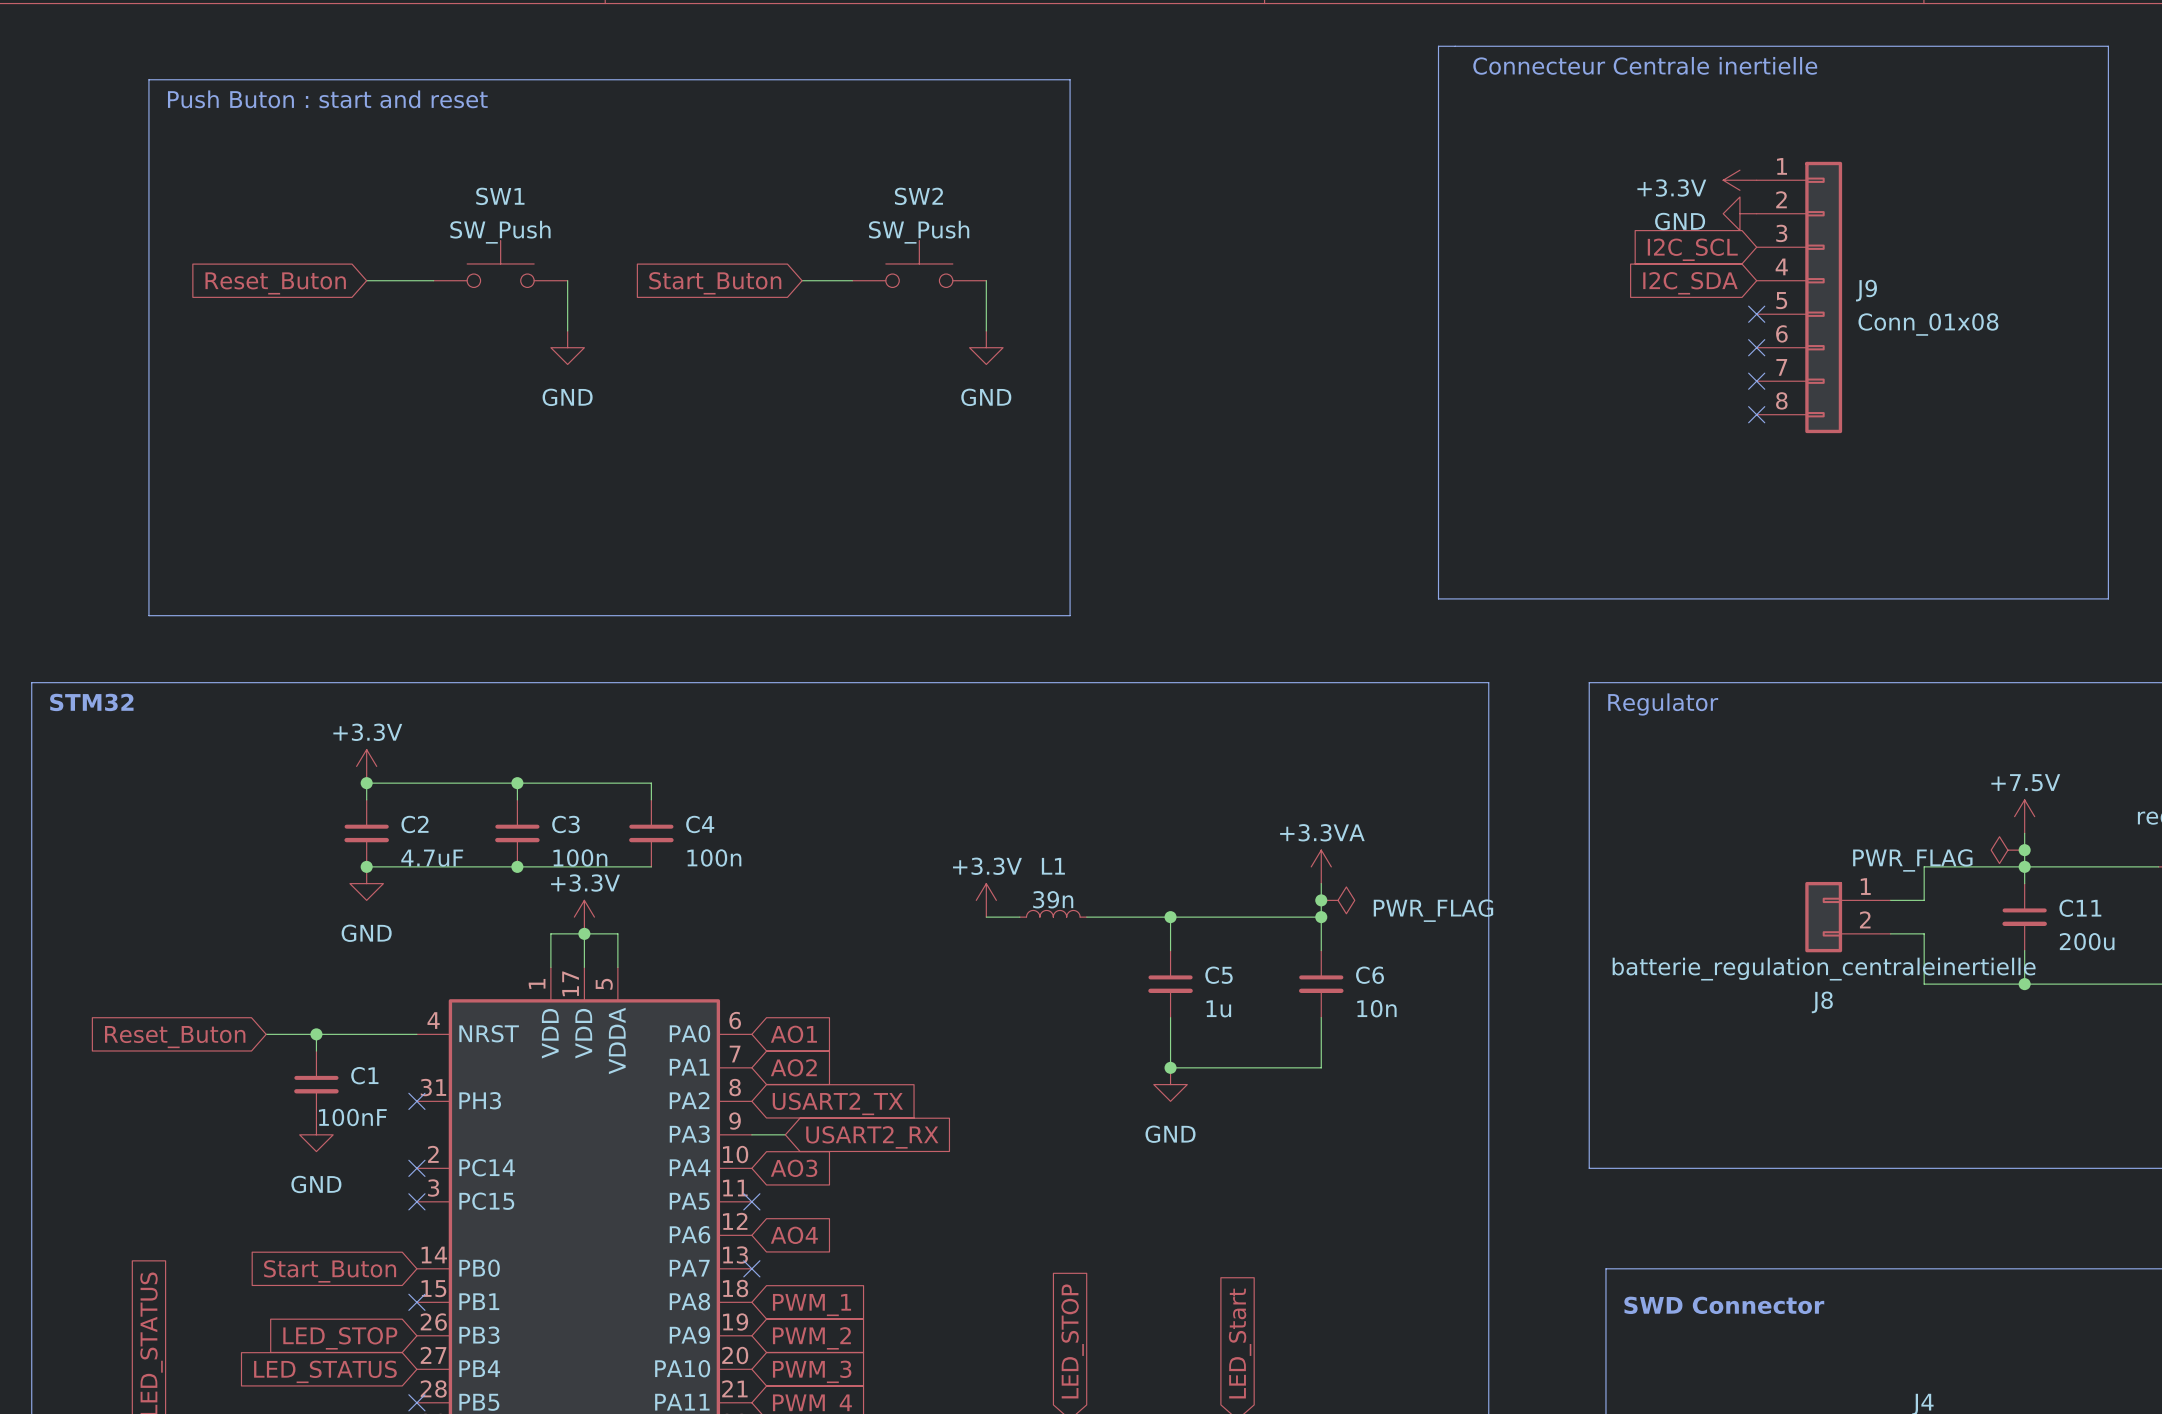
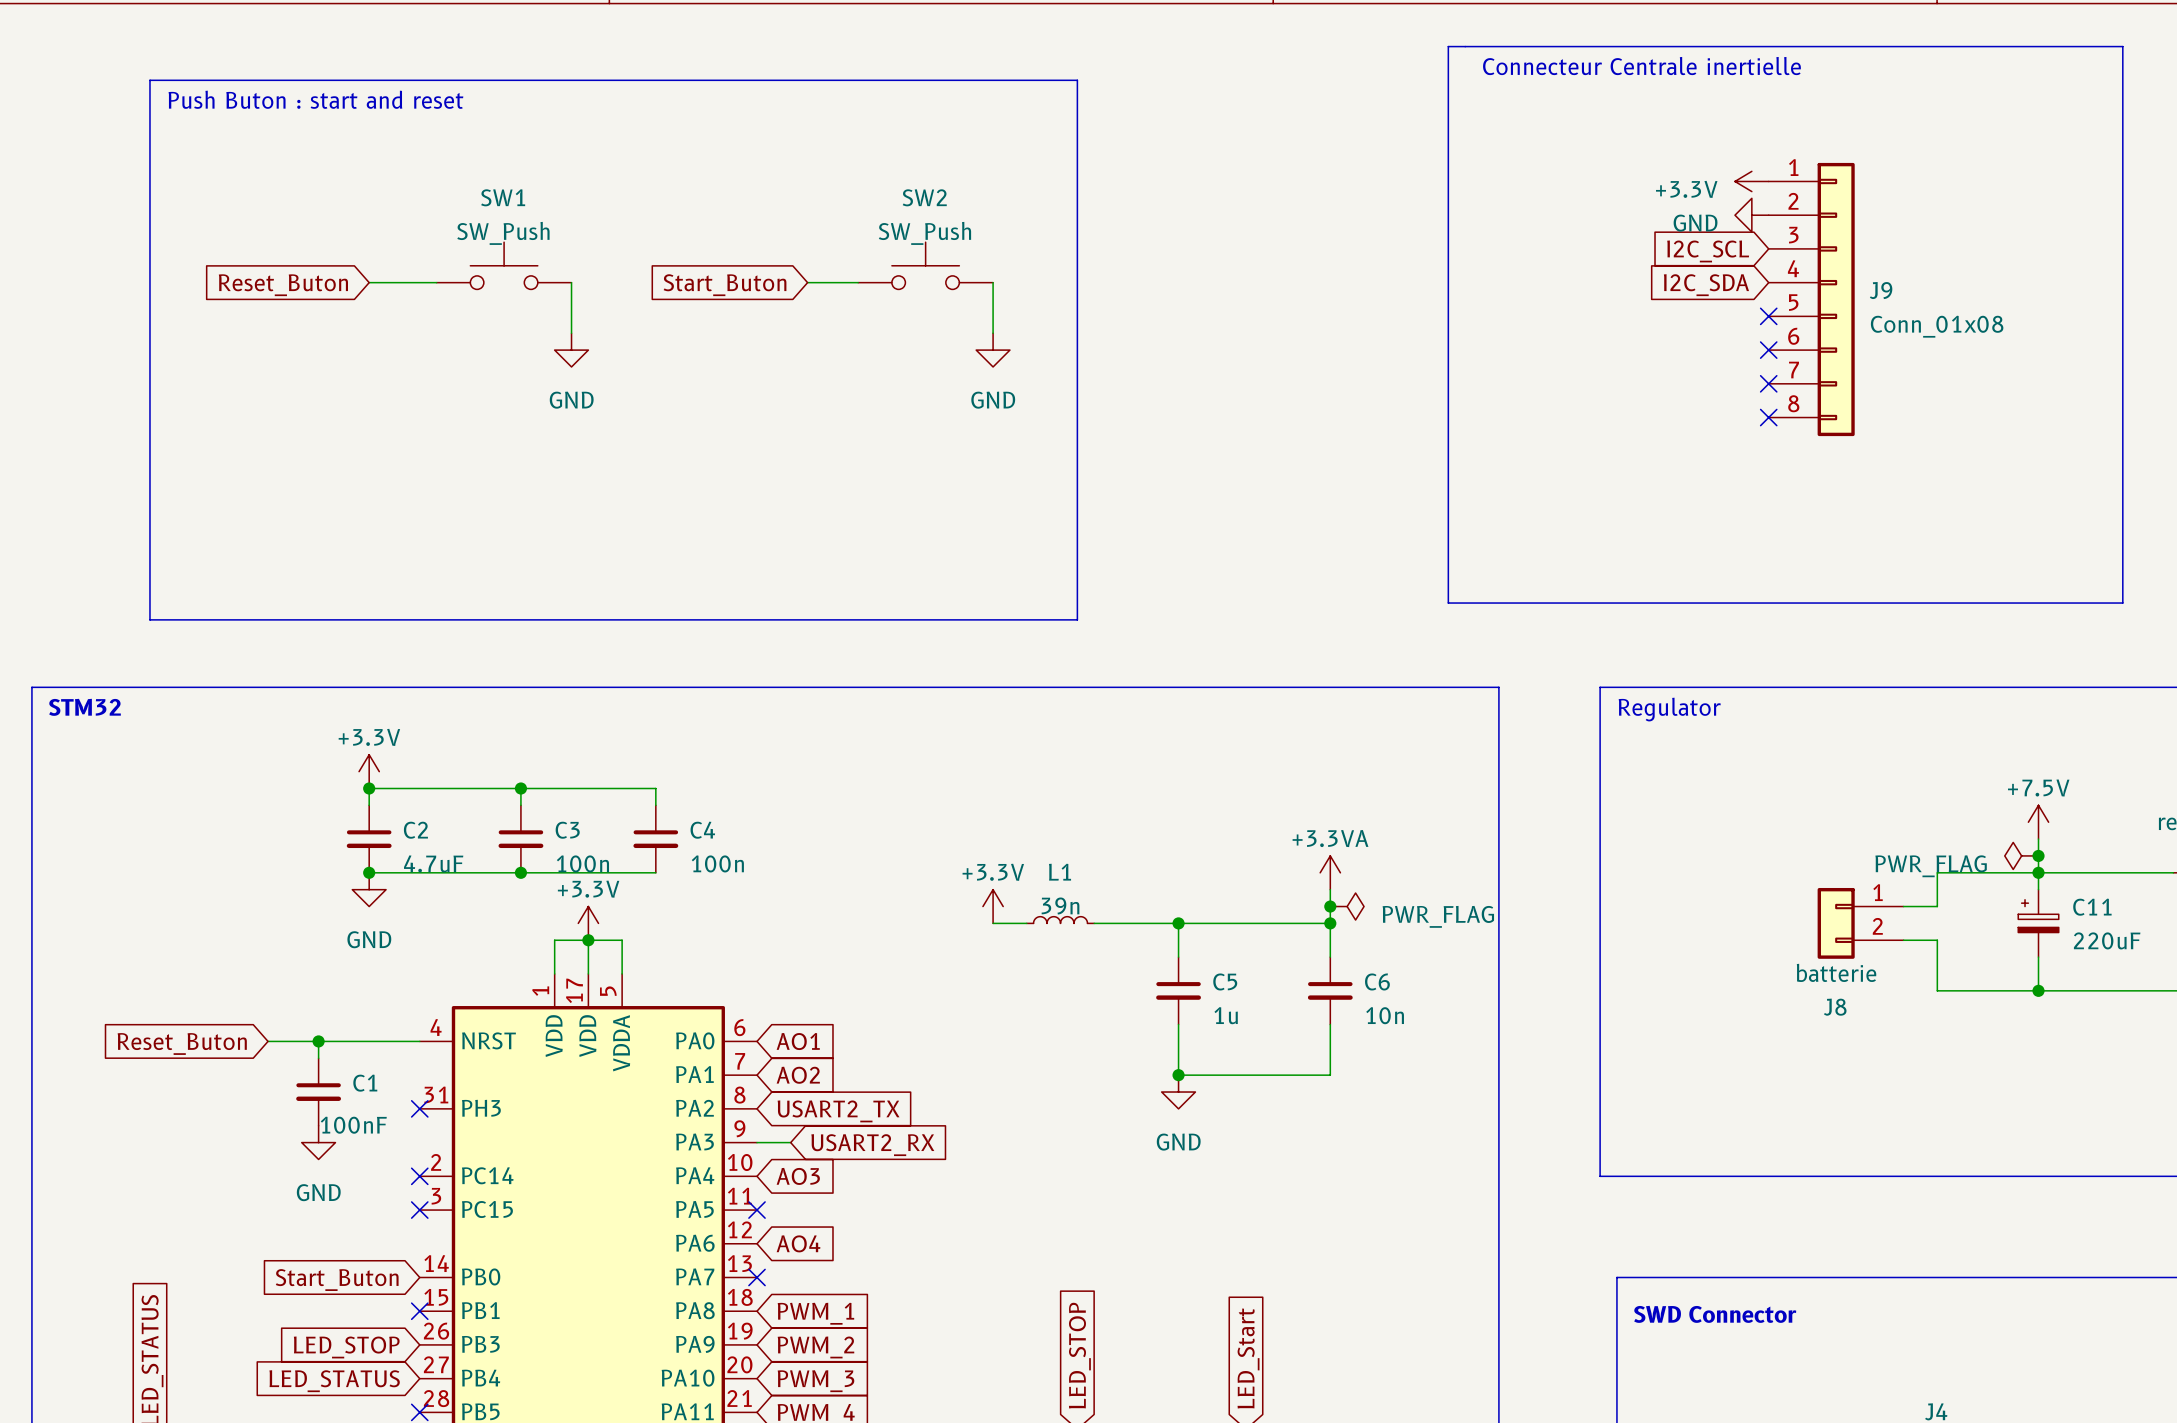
C11 symbol: [2002, 883, 2047, 951] -> [2018, 889, 2059, 958]
C11 value: 200u (2087, 941) -> 220uF (2107, 940)
J8 value: batterie_regulation_centraleinertielle (1824, 969) -> batterie (1836, 972)

